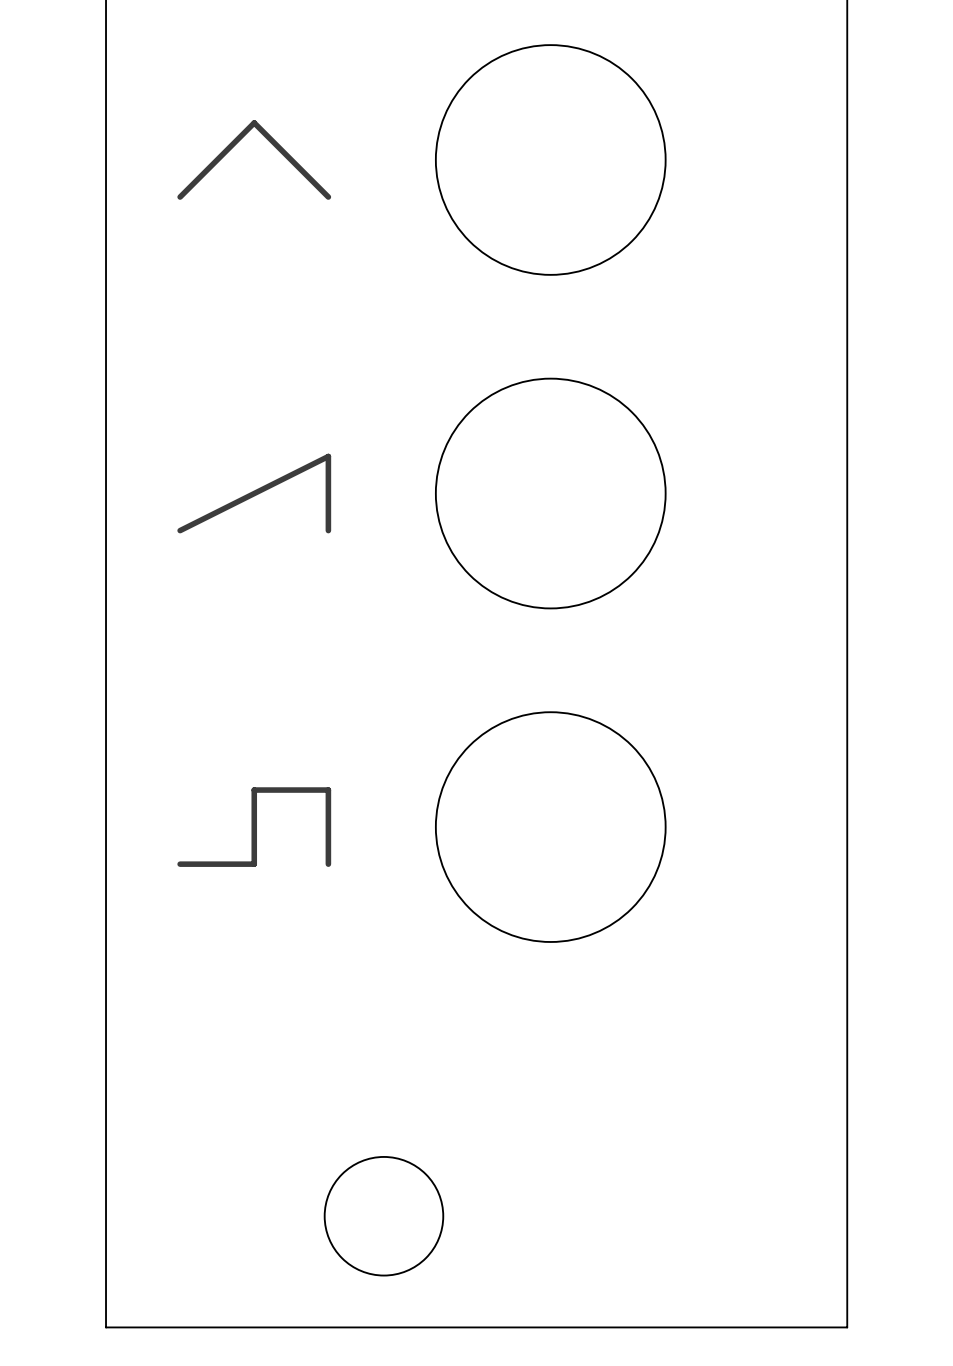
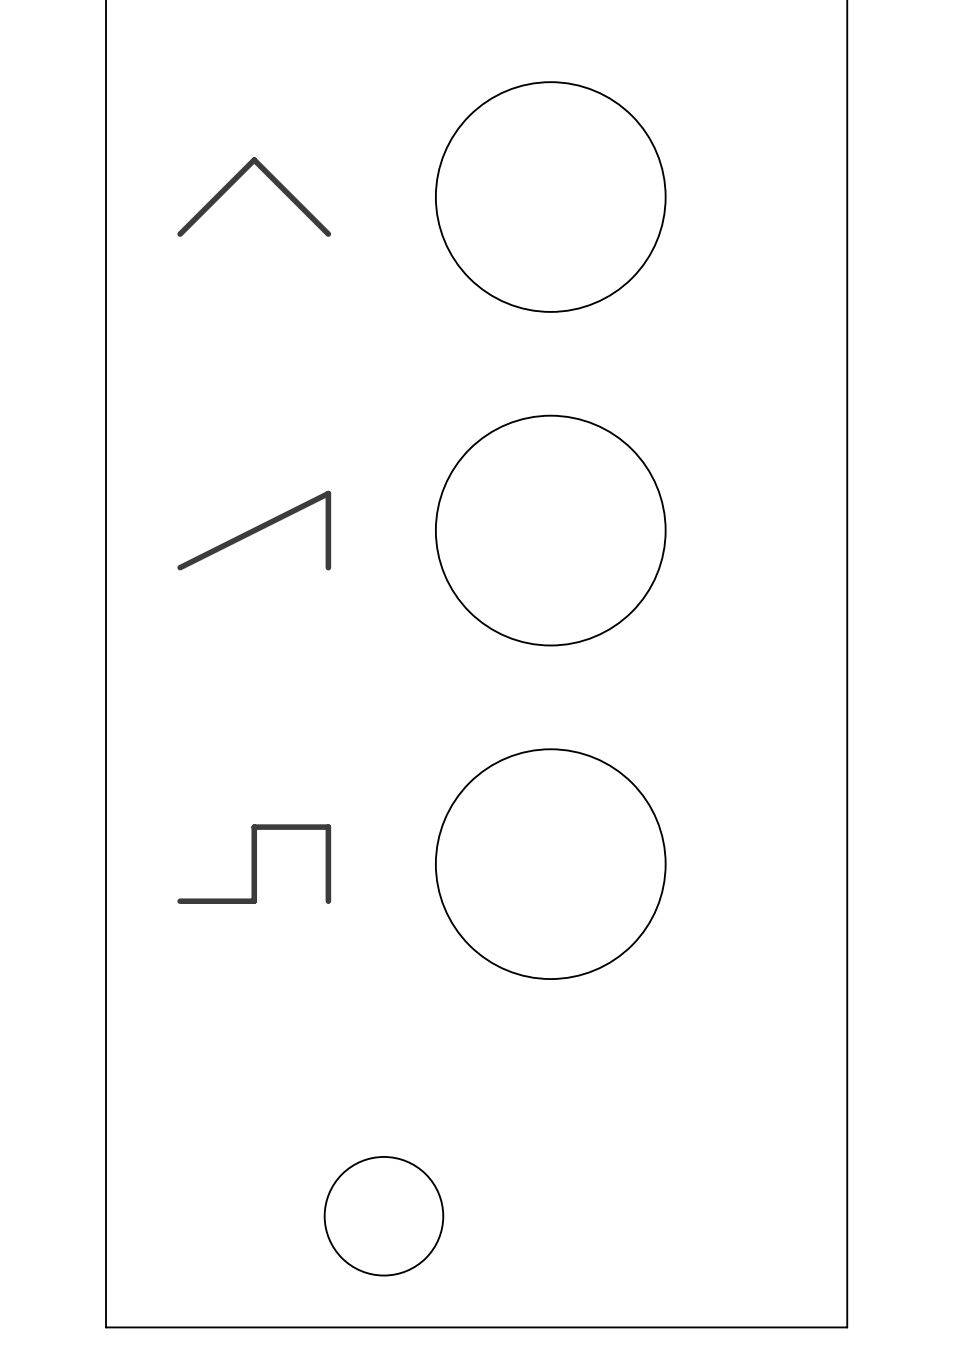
round board edge position: (550, 159) -> (550, 197)
line: (180, 197) (254, 122) (328, 197) -> (180, 234) (254, 159) (328, 234)
line: (328, 493) (328, 456) (180, 530) -> (328, 493) (180, 567)
round board edge position: (550, 493) -> (550, 530)
line: none -> (328, 530) (328, 567)
line: (254, 827) (254, 790) (328, 790) (328, 827) -> (254, 827) (328, 827)
round board edge position: (550, 827) -> (550, 864)
line: (180, 864) (254, 864) -> (180, 901) (254, 901) (254, 864)
line: none -> (328, 864) (328, 901)

